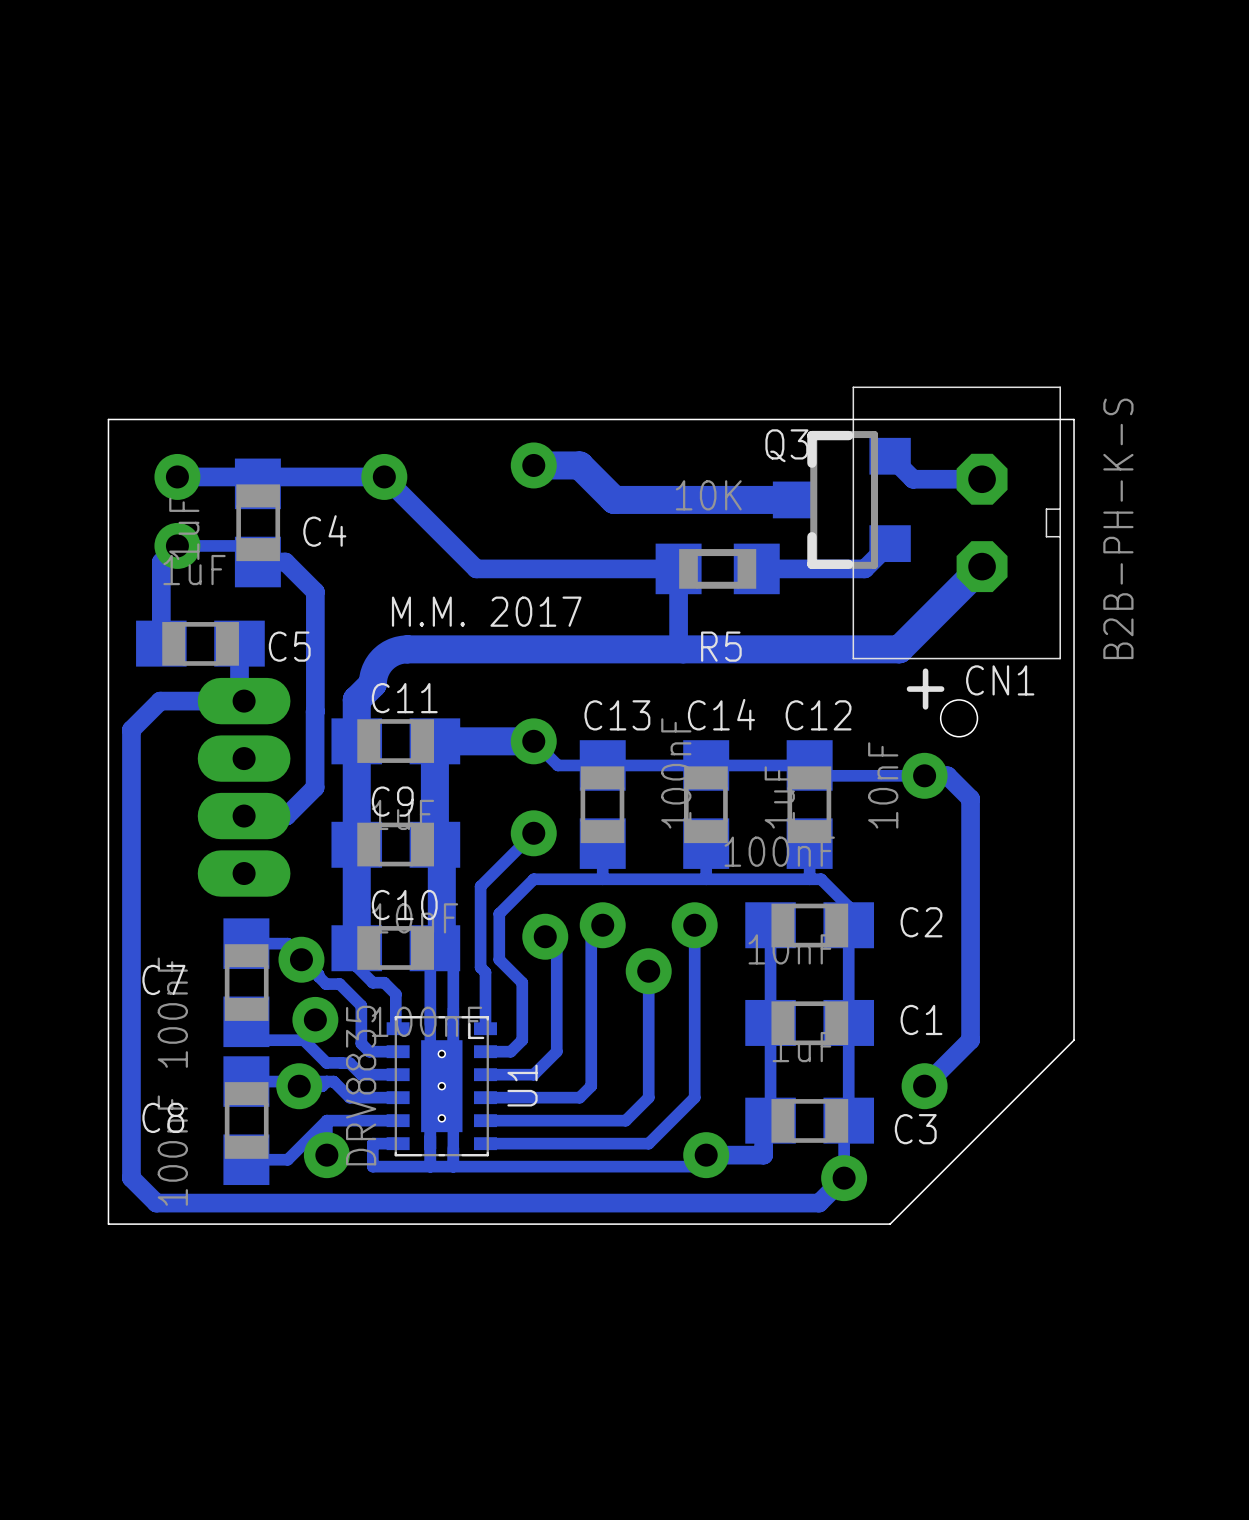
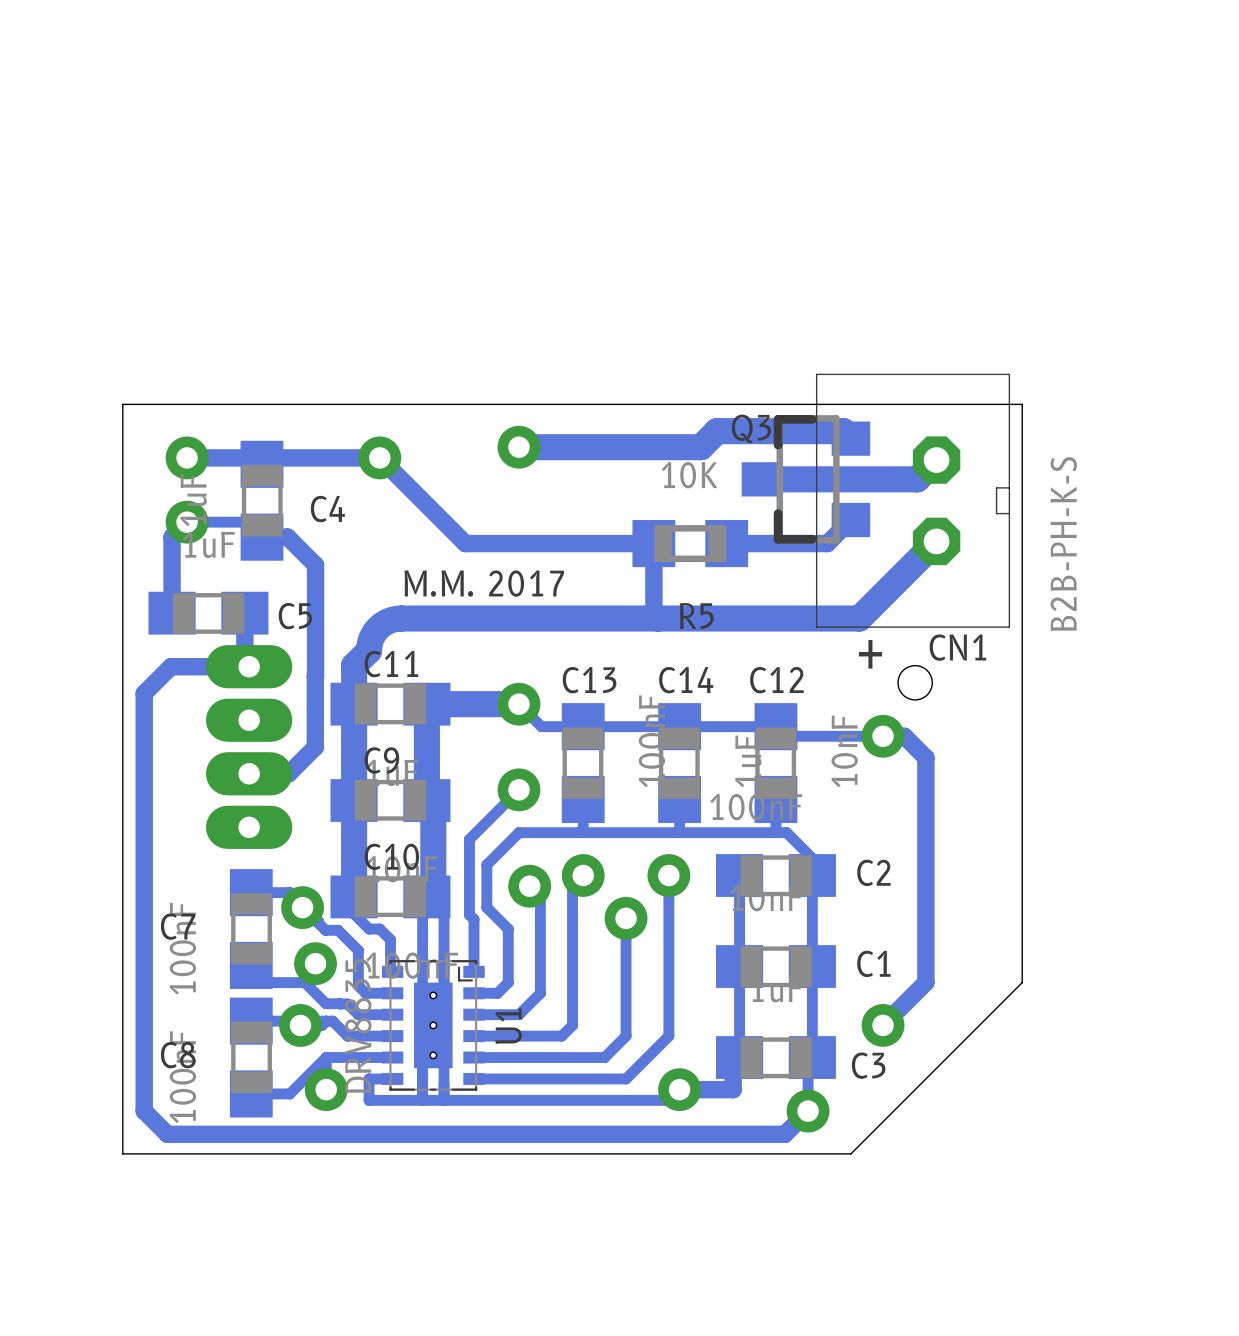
track: (890, 456) (913, 479) (982, 479) -> (760, 479) (917, 479) (936, 460)
track: (579, 465) (614, 499) (793, 499) -> (561, 447) (701, 447) (717, 431) (843, 431) (850, 438)

